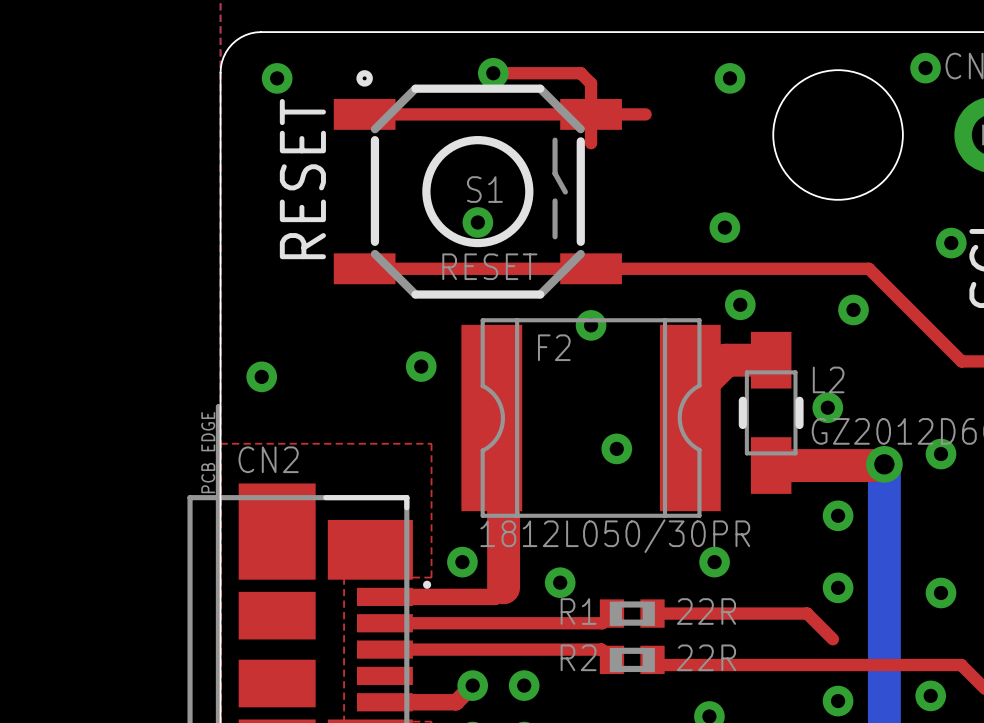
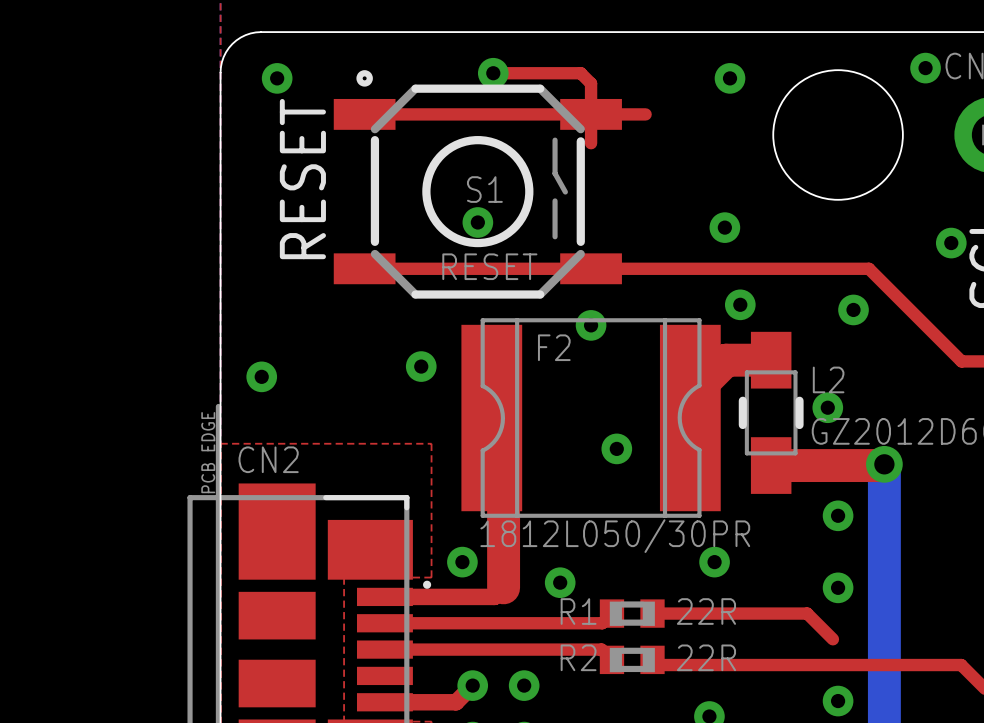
via: (941, 454) -> none
via: (941, 592) -> none
via: (930, 695) -> none

